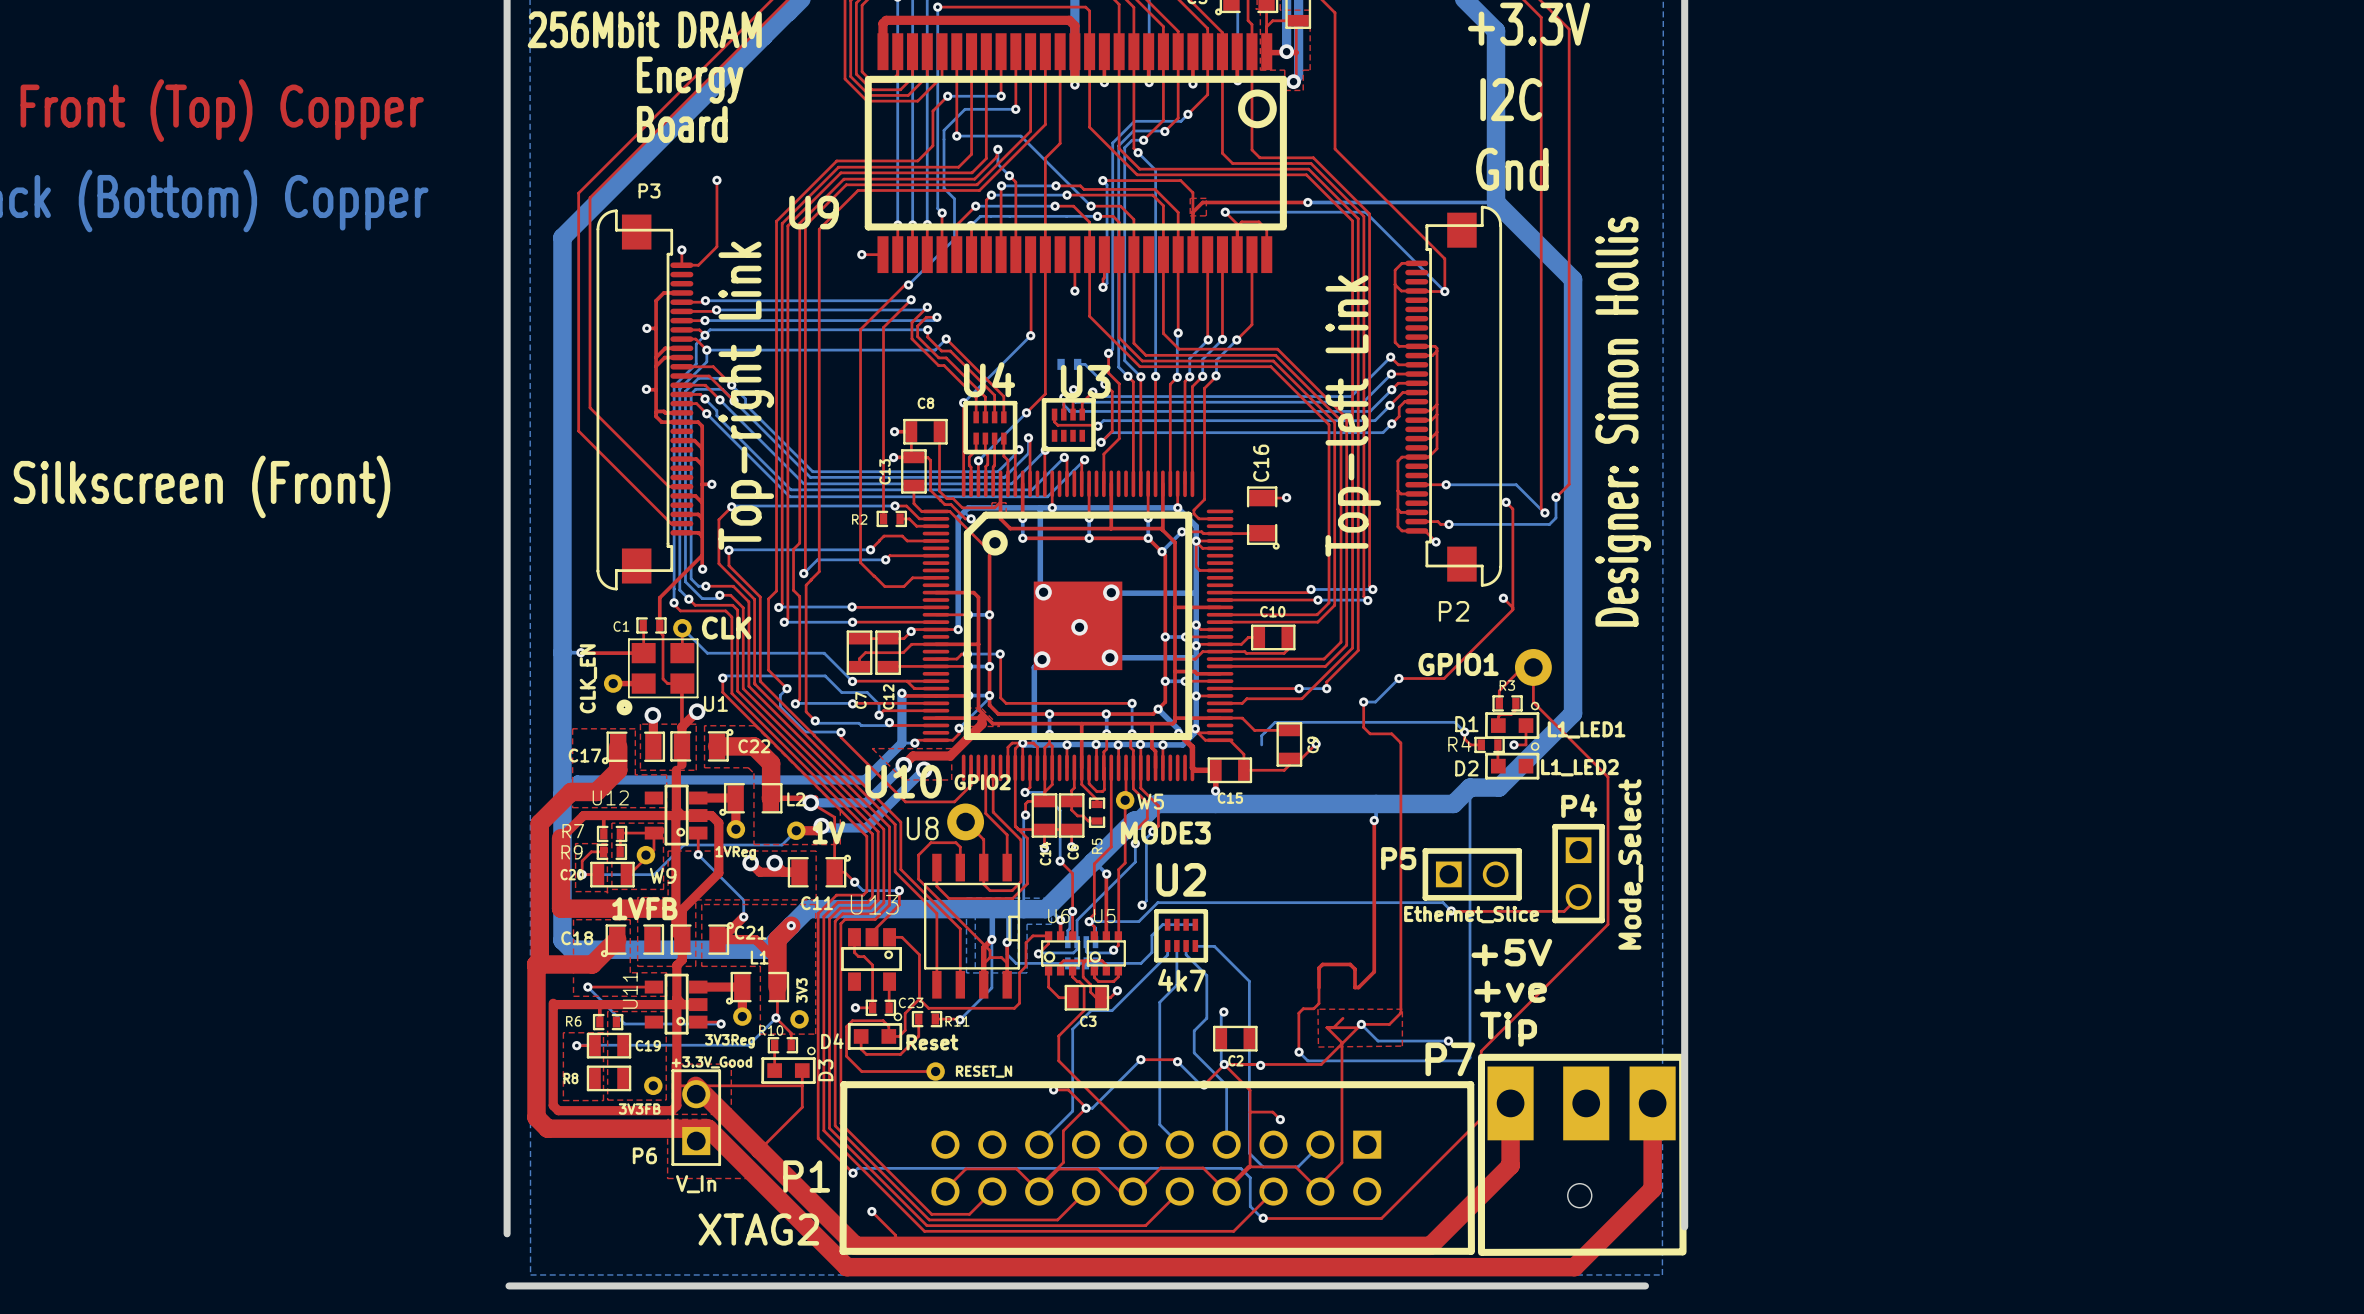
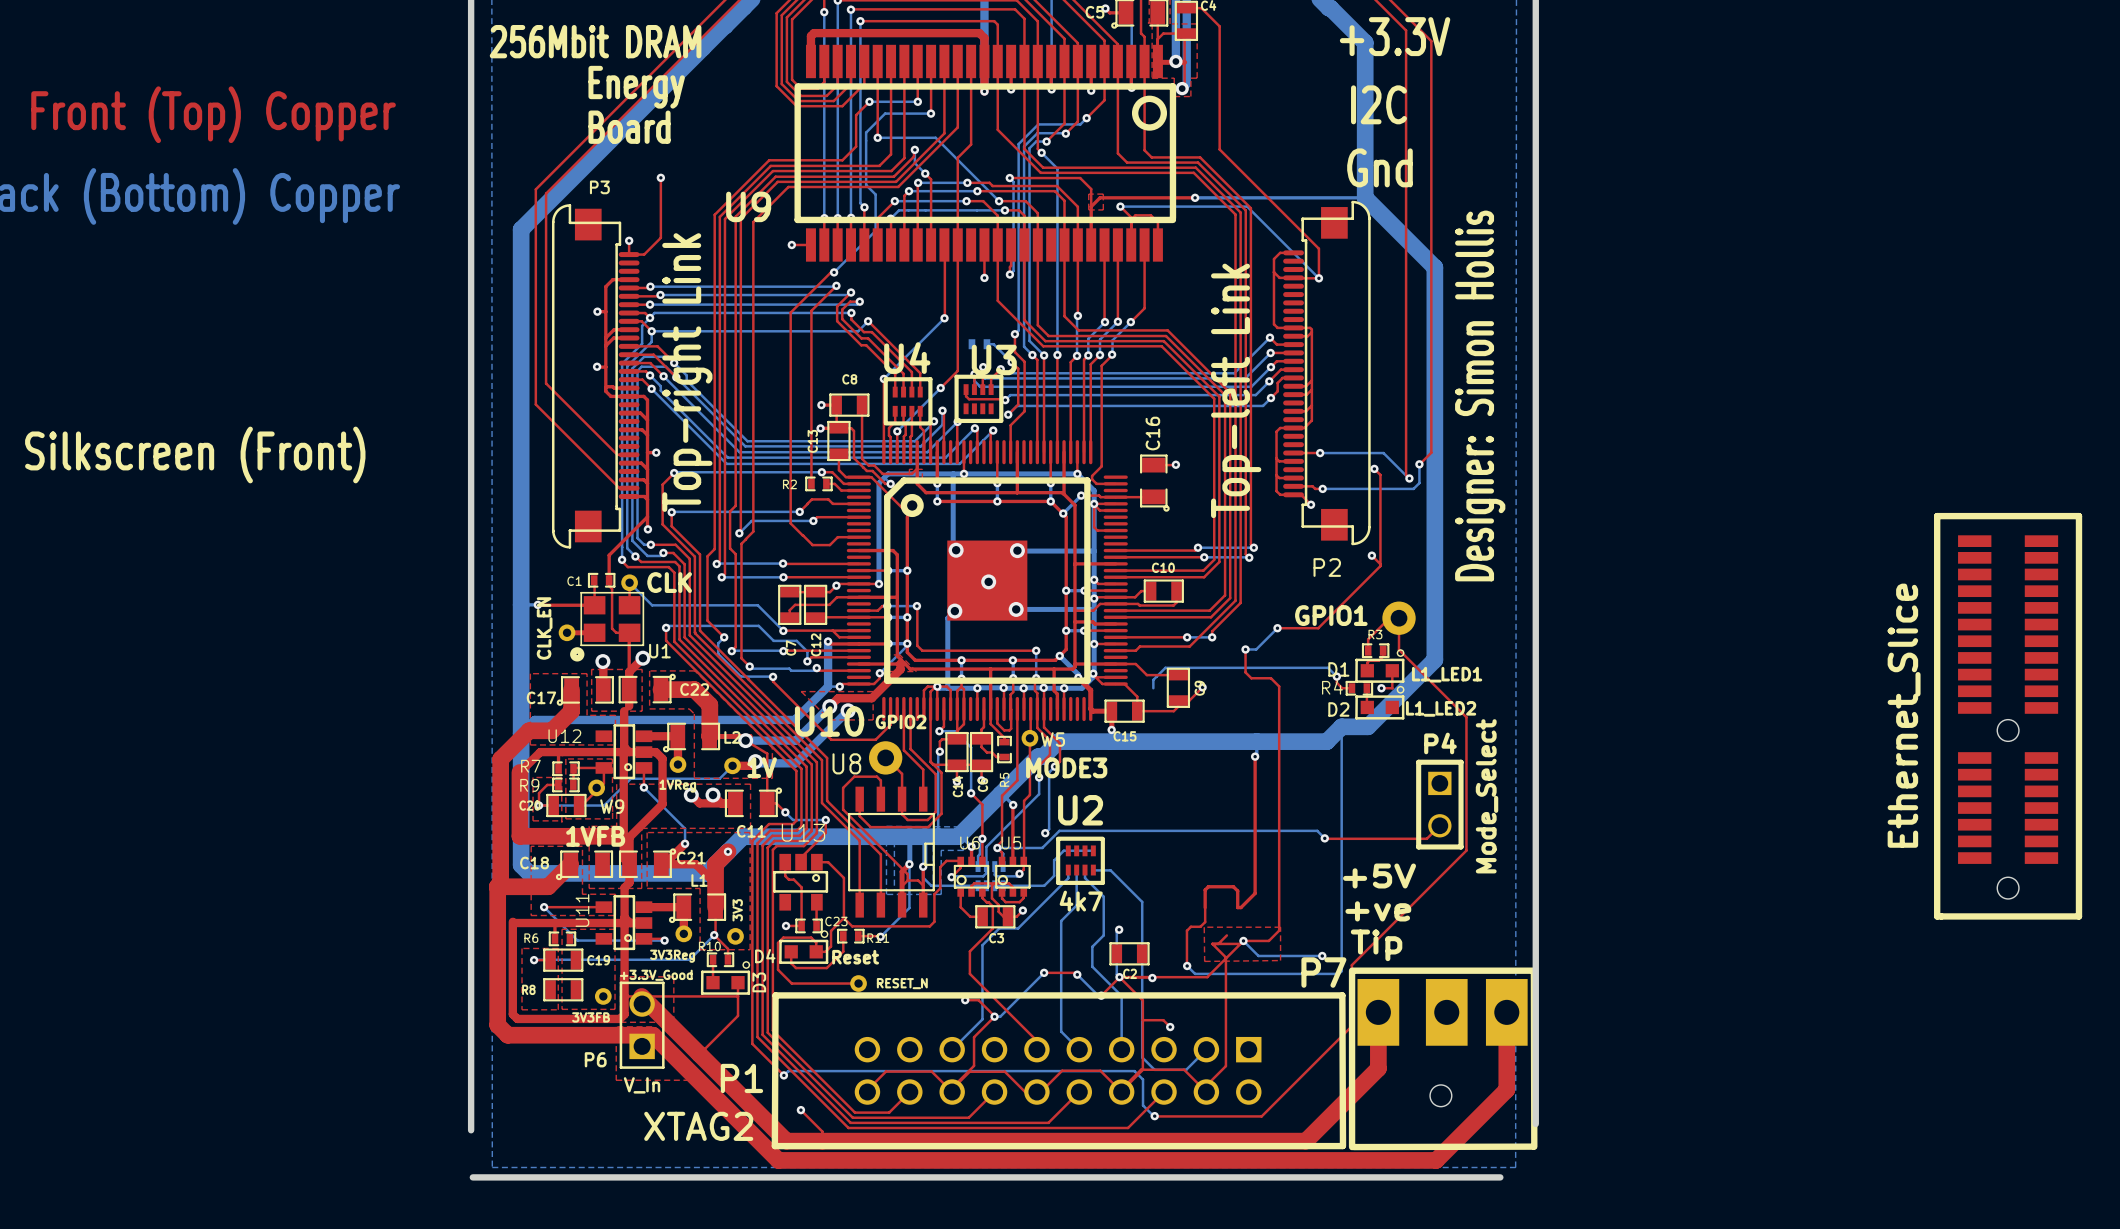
part: none -> Ethernet_Slice (2008, 716)
P5: Ethernet_Slice (1472, 874) -> none

